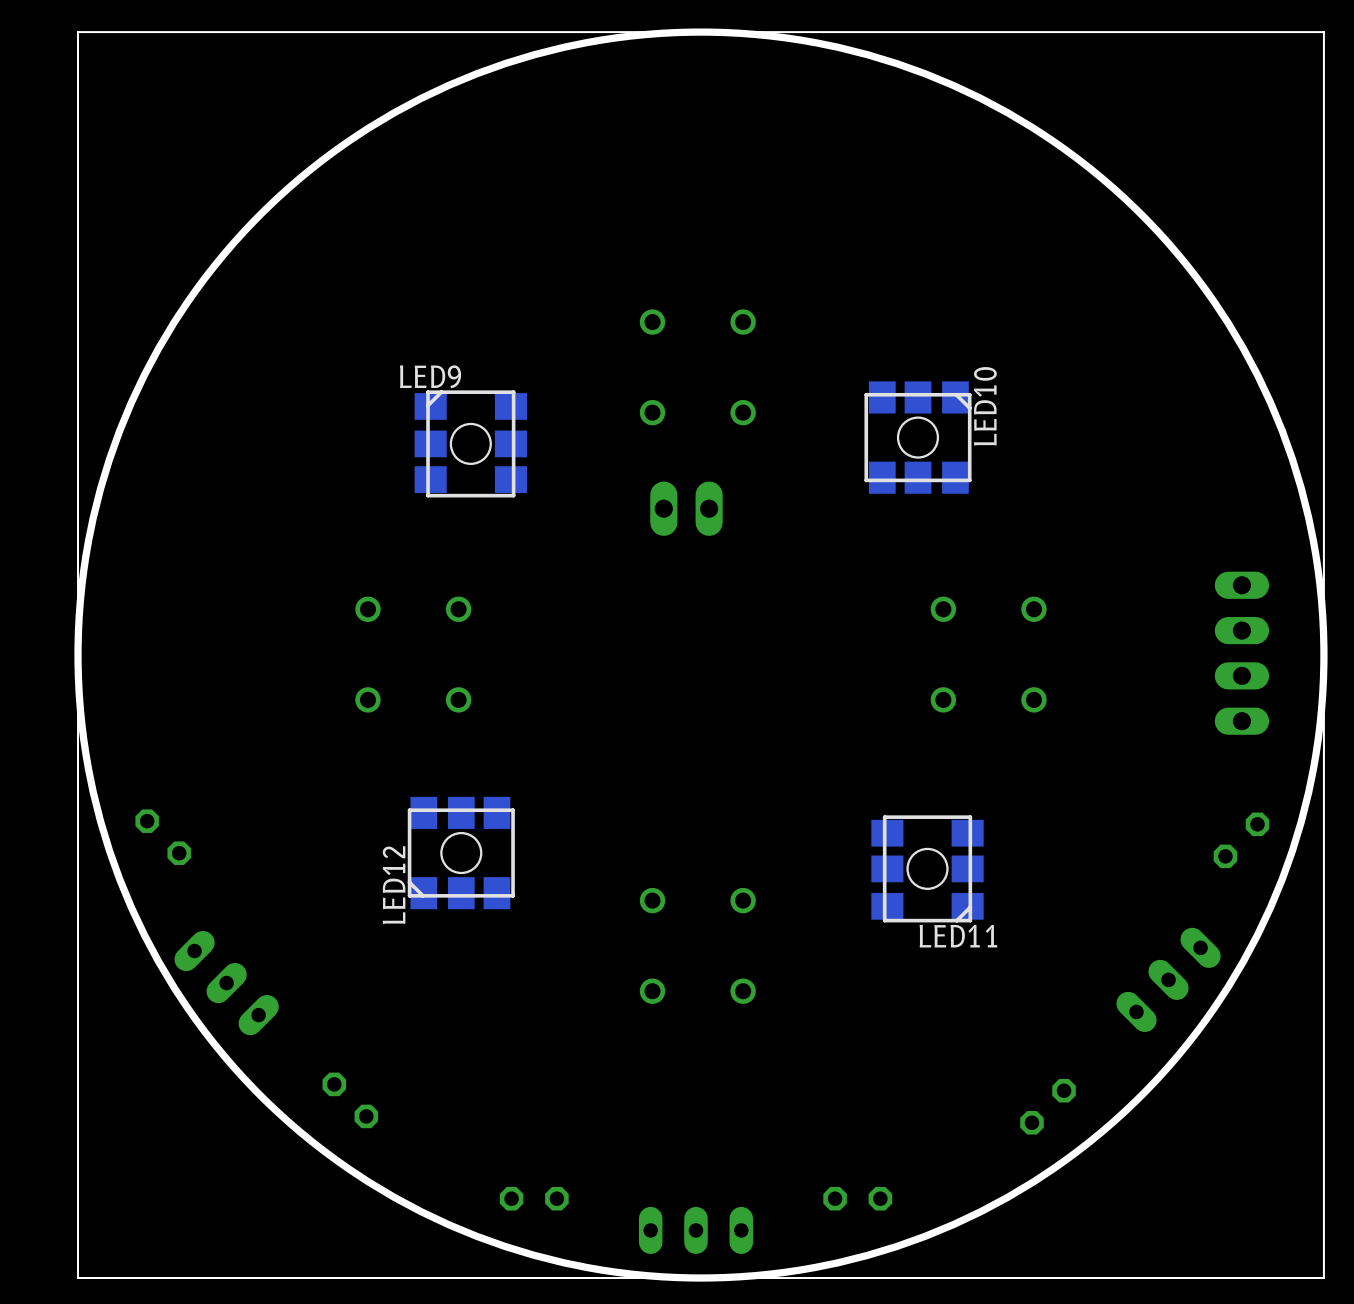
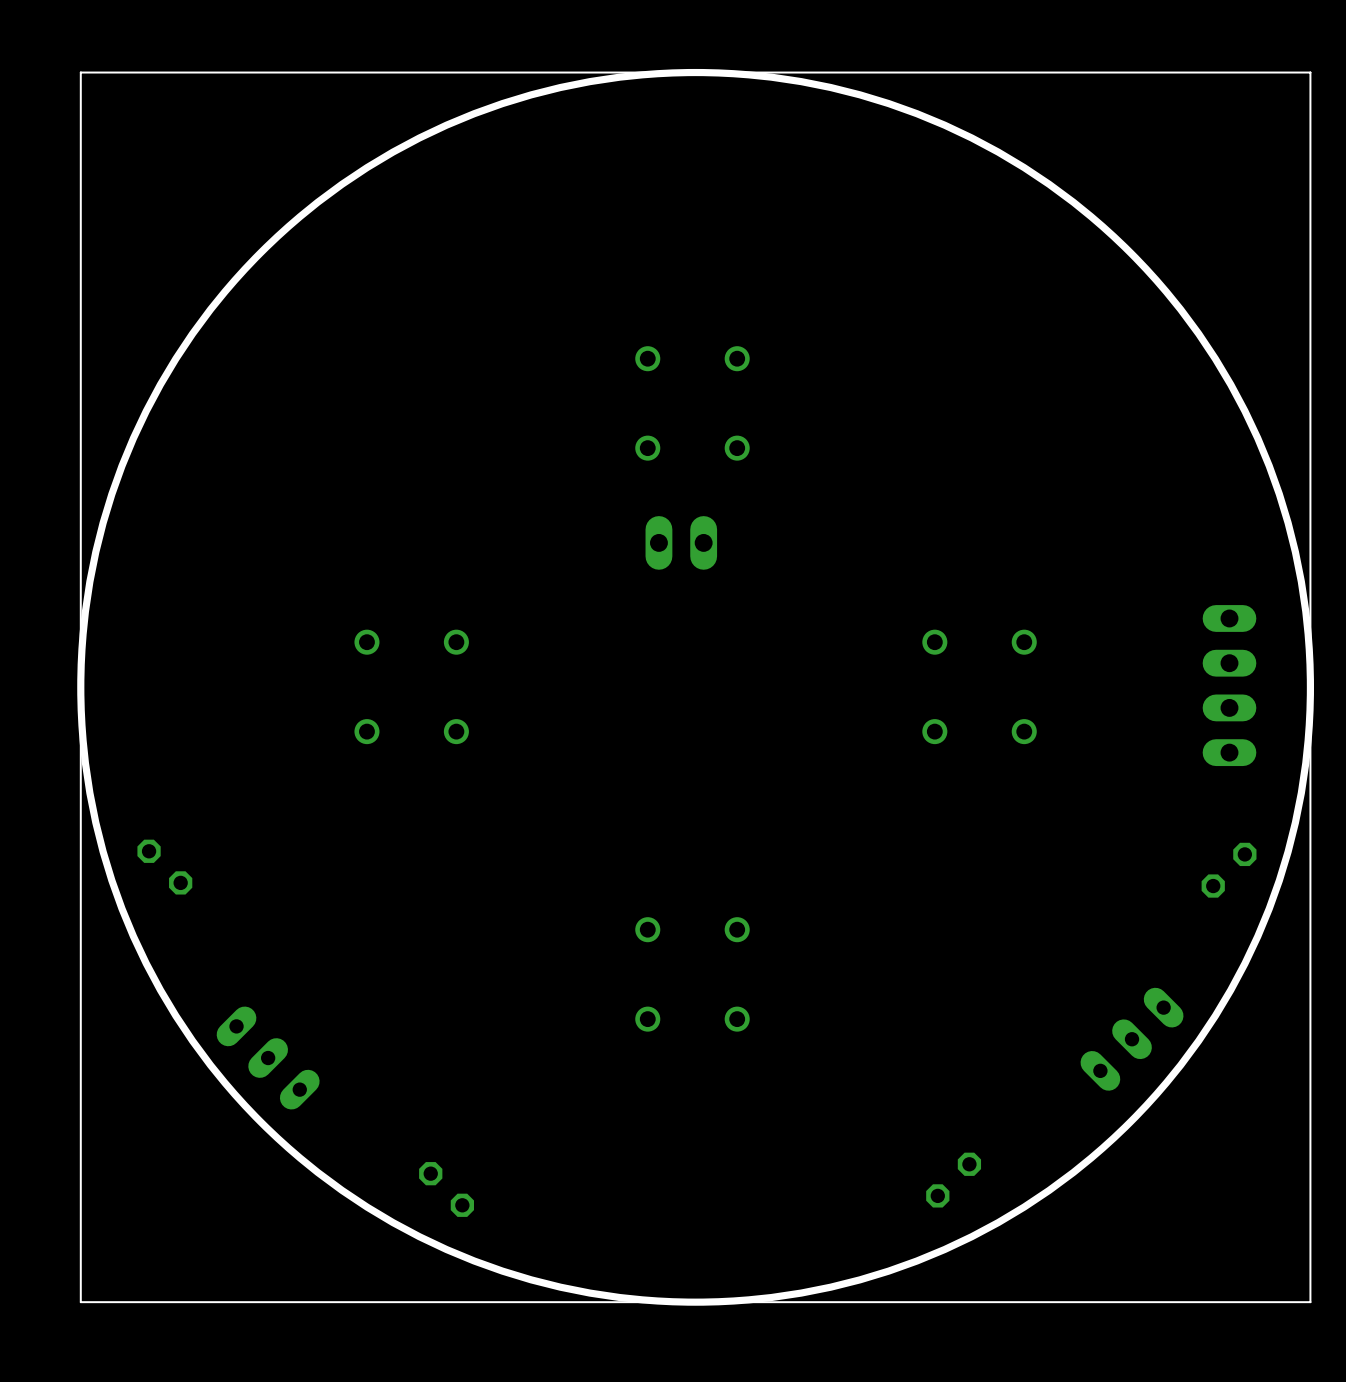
LED10: (917, 437) -> none
LED9: (470, 443) -> none
LED12: (461, 853) -> none
LED11: (927, 868) -> none
part: (1168, 979) -> none
part position: (226, 983) -> (268, 1058)
part: none -> (1132, 1039)
part position: (350, 1100) -> (446, 1189)
part position: (1048, 1106) -> (953, 1180)
part: (534, 1198) -> none
part: (857, 1198) -> none
part: (695, 1230) -> none

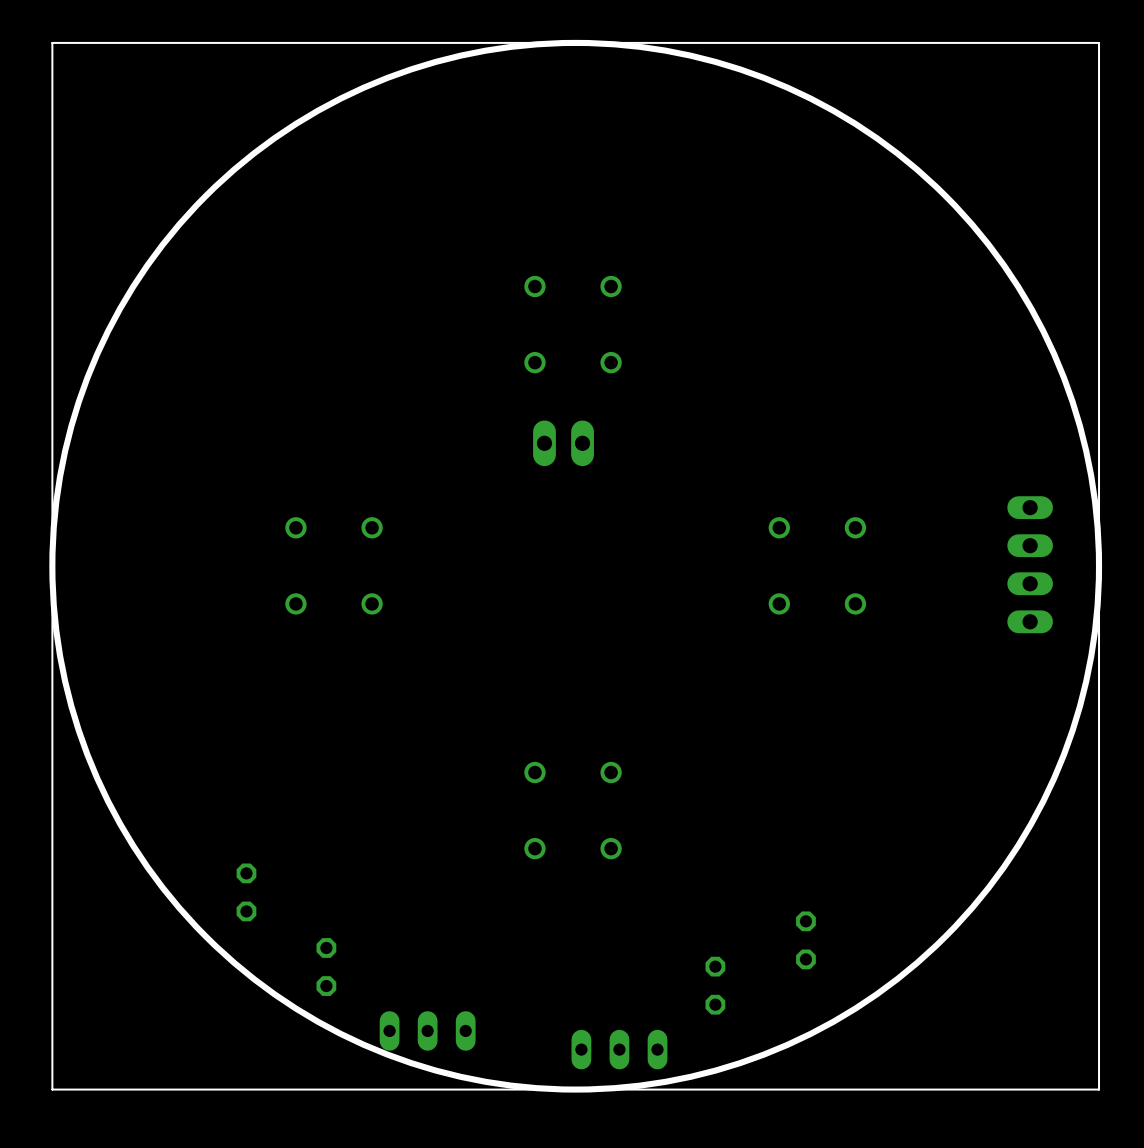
part: (164, 867) -> none
part: (1229, 870) -> none
part: (1132, 1039) -> none
part: (268, 1058) -> none
part: none -> (246, 892)
part: none -> (805, 940)
part: none -> (326, 967)
part: none -> (715, 985)
part: (953, 1180) -> none
part: (446, 1189) -> none
part: none -> (427, 1030)
part: none -> (619, 1049)

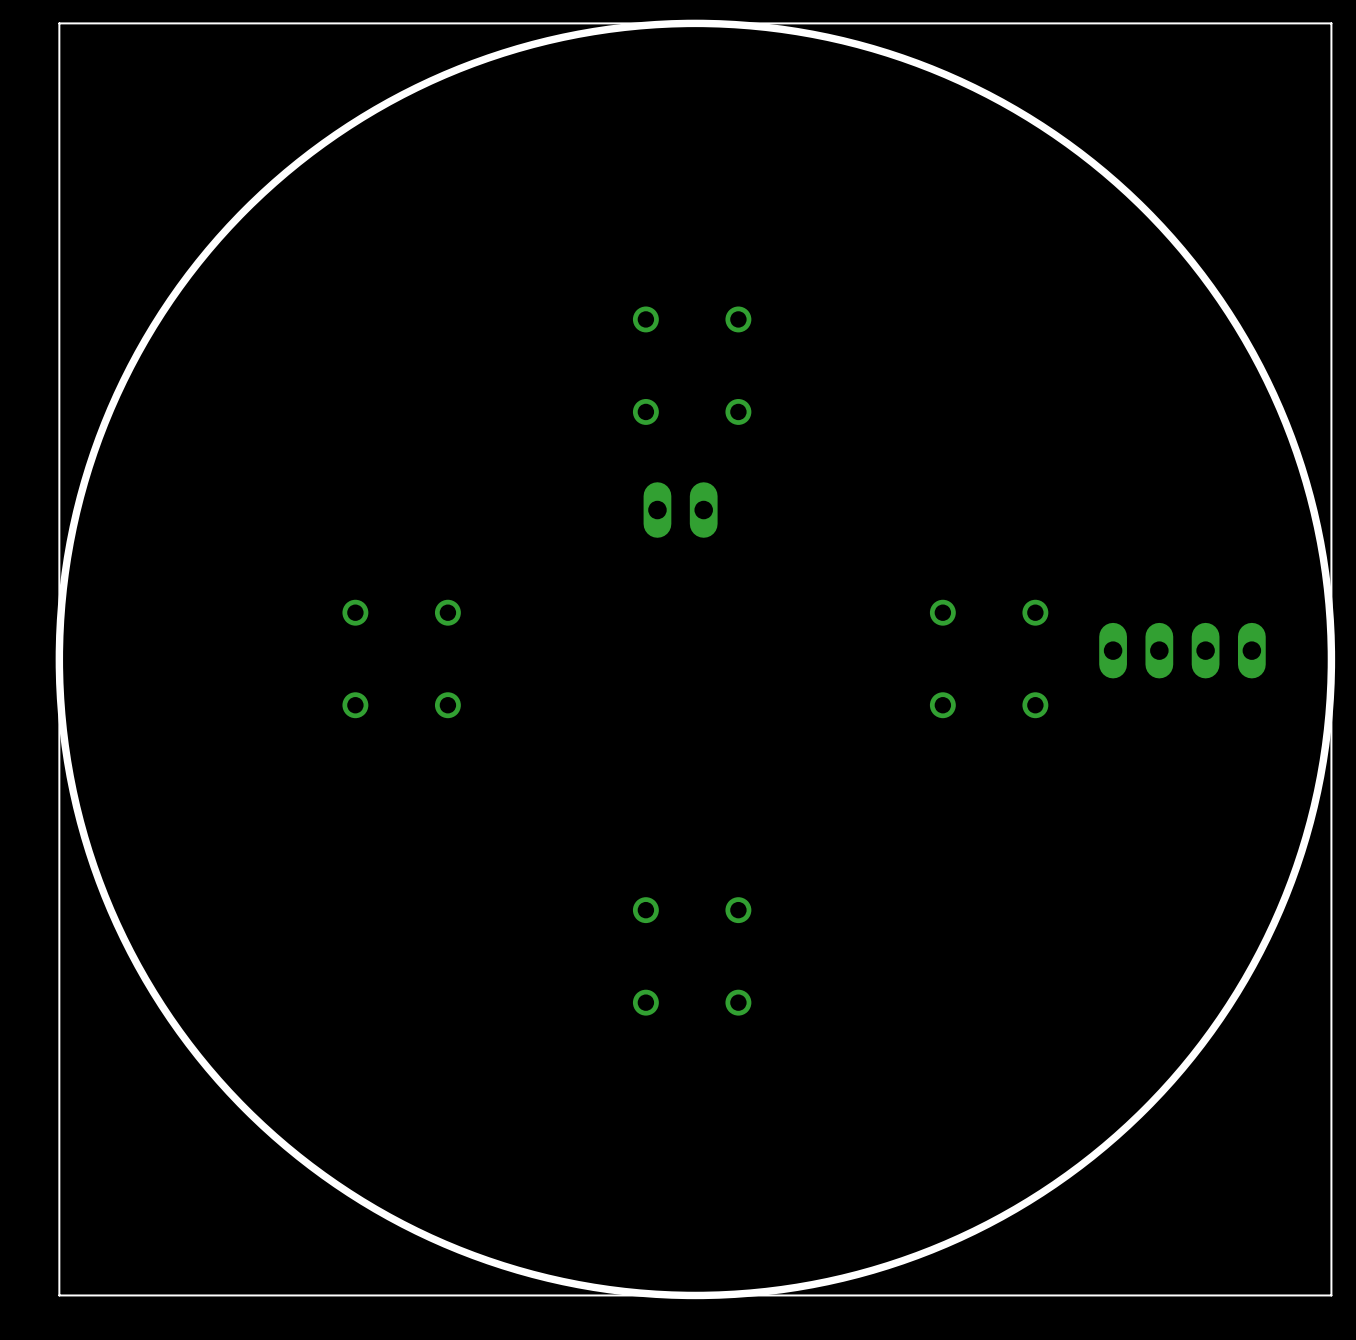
part rotation: 0° (1030, 564) -> 90° clockwise (1182, 650)
part: (246, 892) -> none
part: (805, 940) -> none
part: (326, 967) -> none
part: (715, 985) -> none
part: (427, 1030) -> none
part: (619, 1049) -> none

